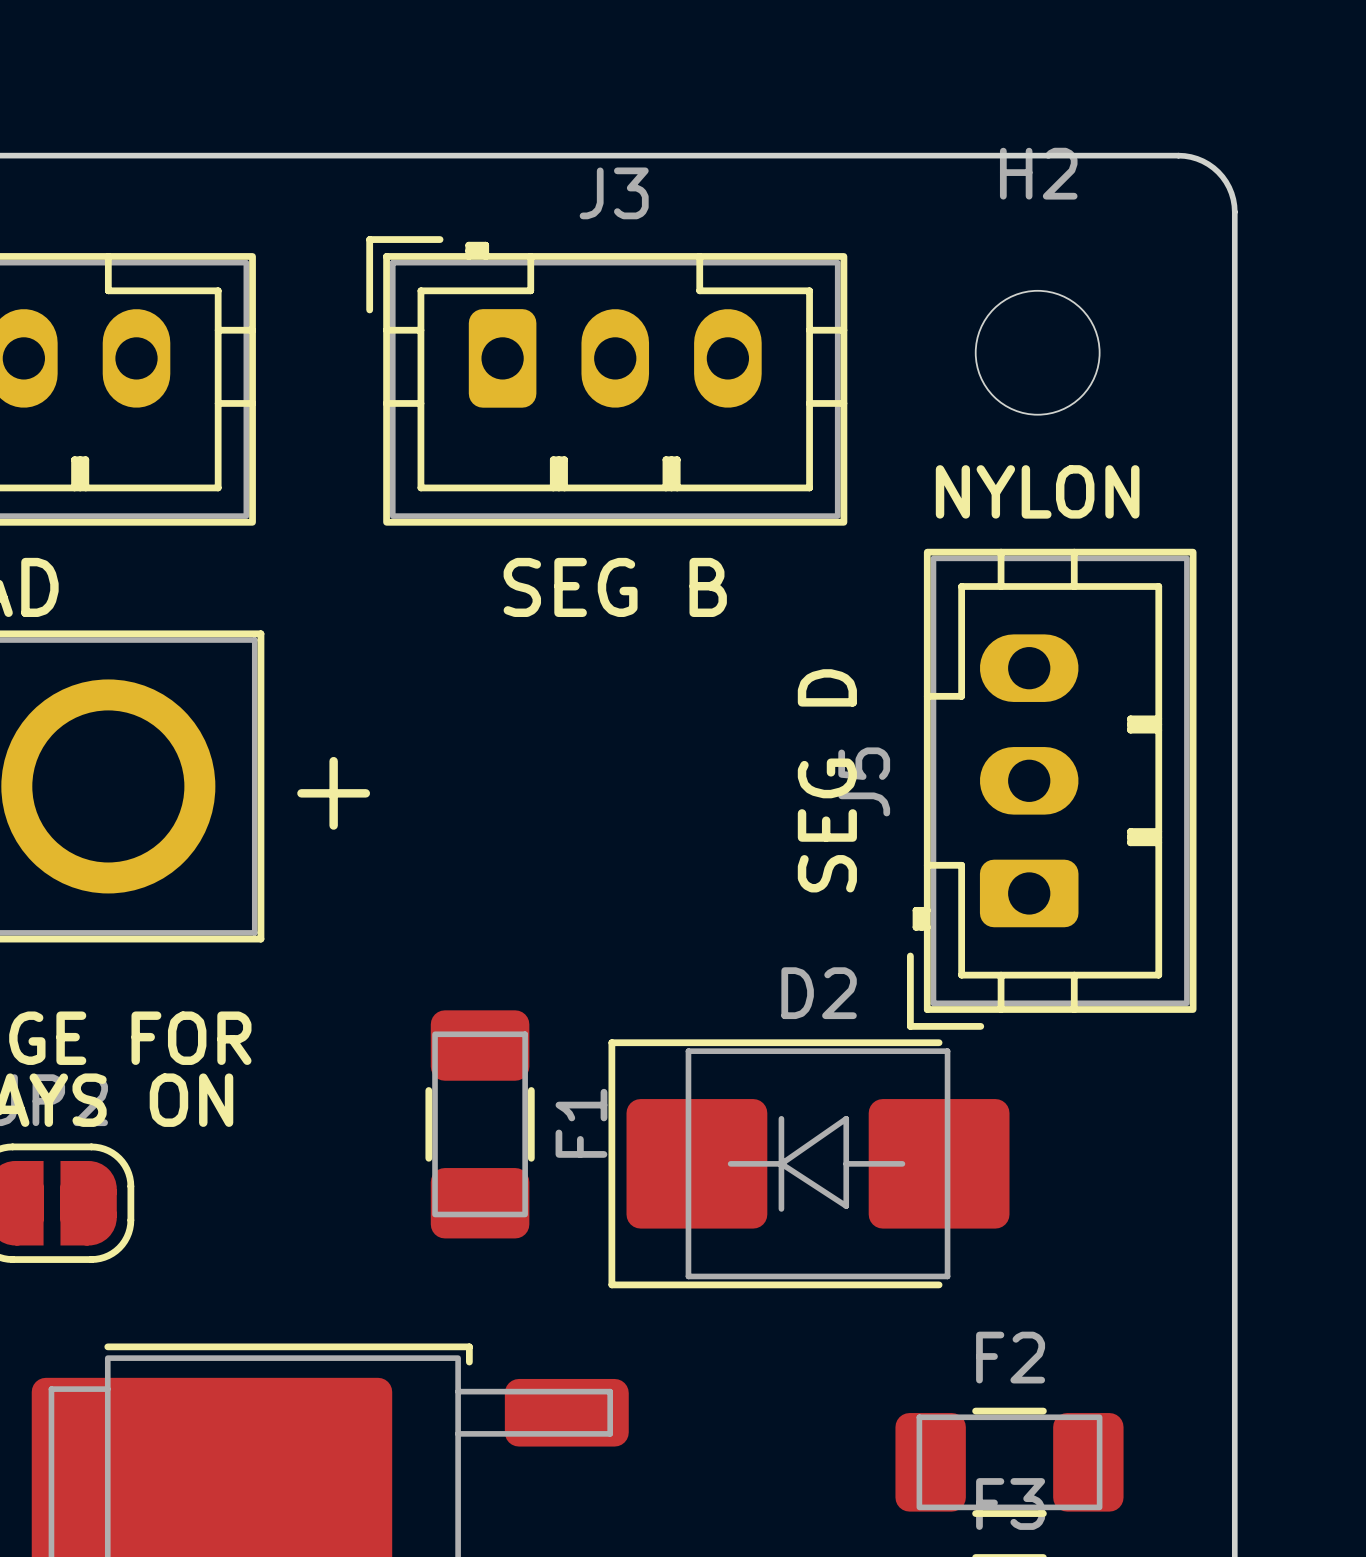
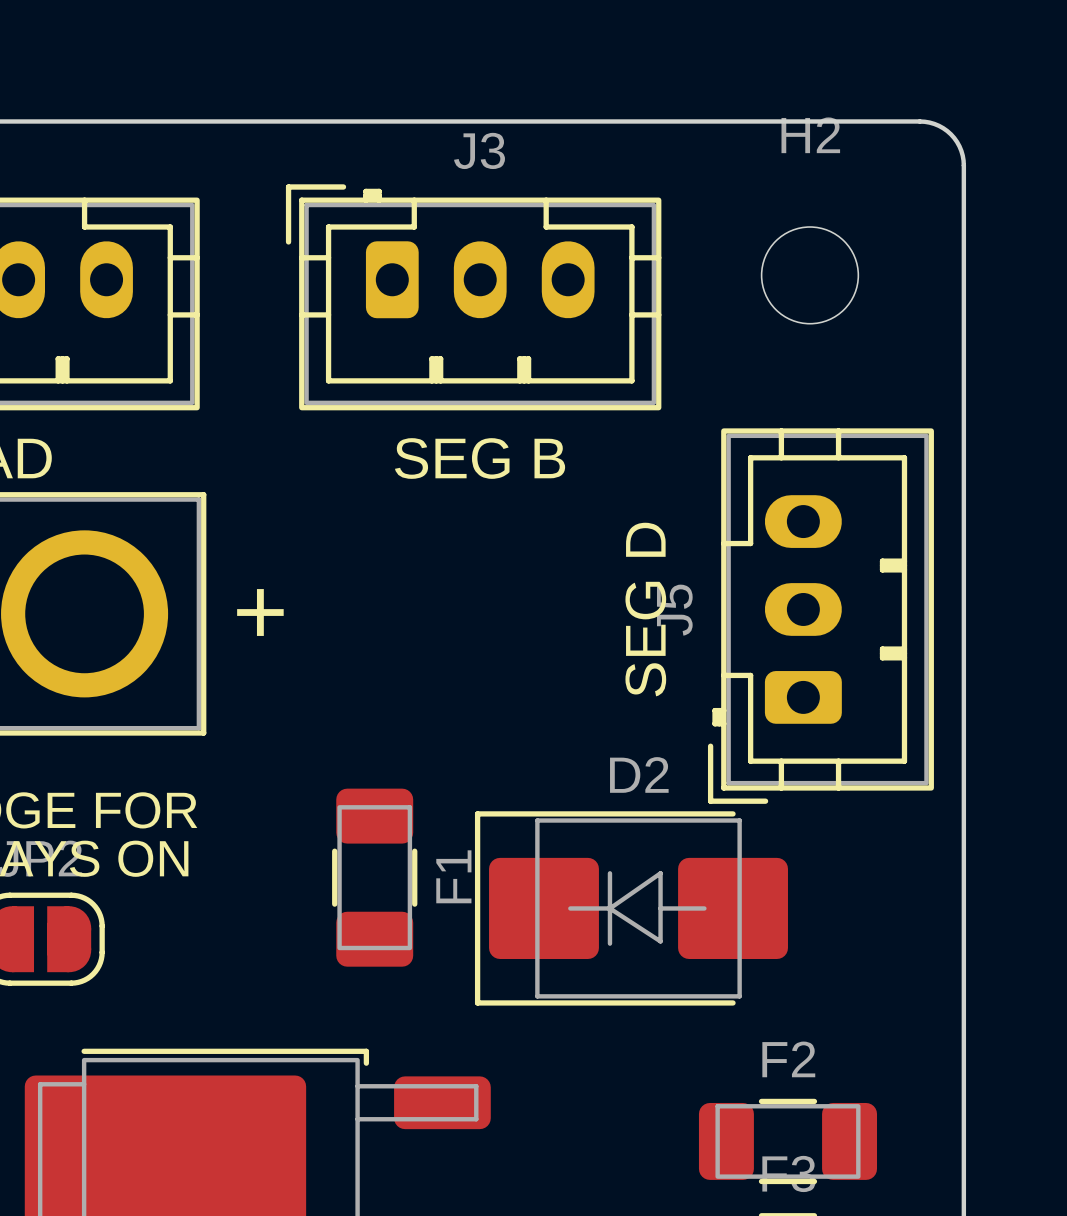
text: NYLON (1037, 491) -> none

